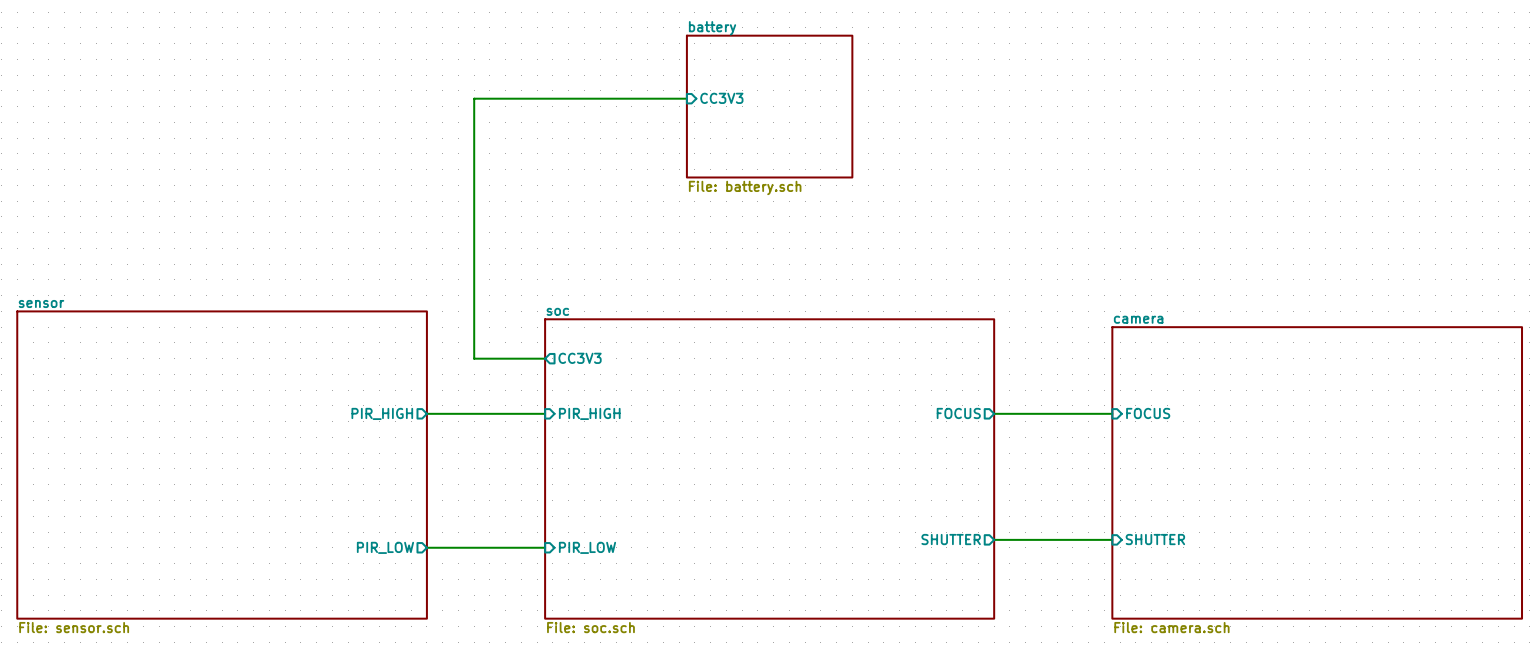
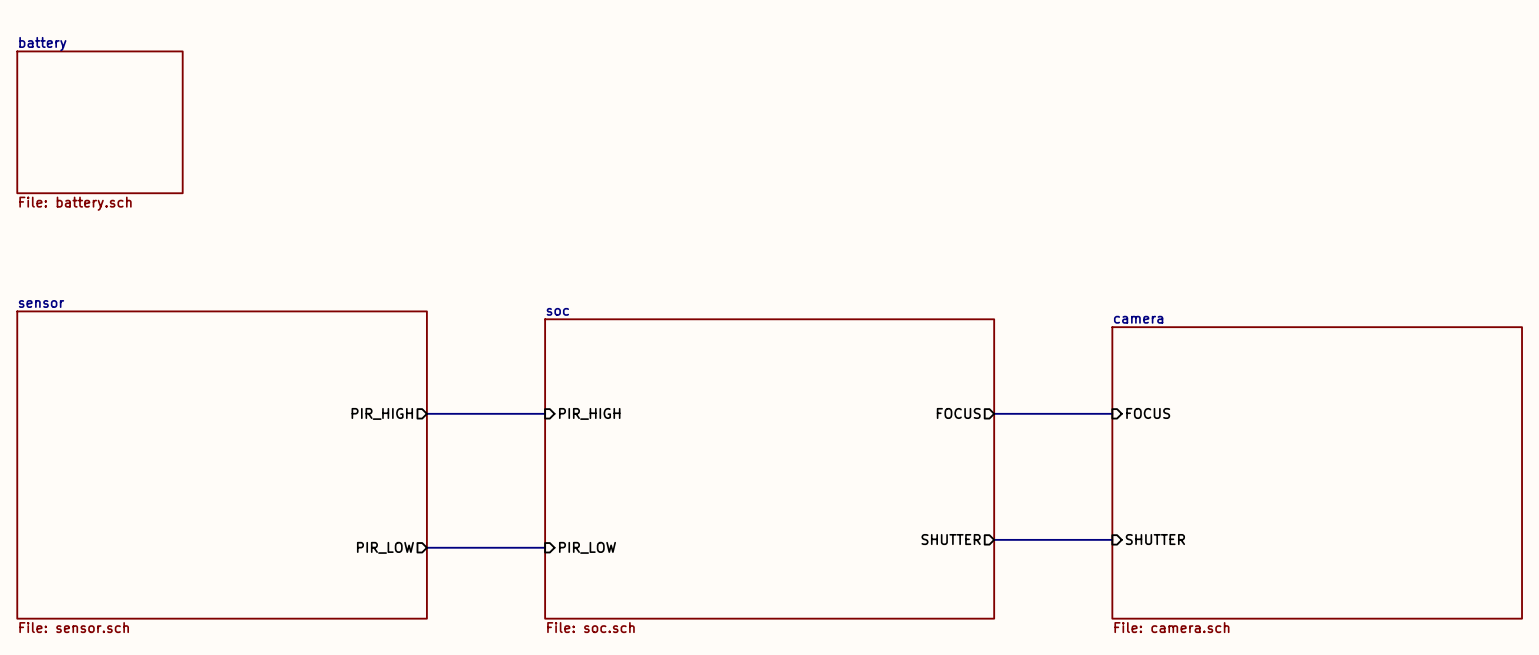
wire: (686, 98) (474, 98) (474, 358) (545, 358) -> none
sheet pin: CC3V3 (721, 98) -> none
sheet battery: File: battery.sch (769, 106) -> none
sheet battery: none -> File: battery.sch (99, 122)
sheet pin: CC3V3 (580, 358) -> none

